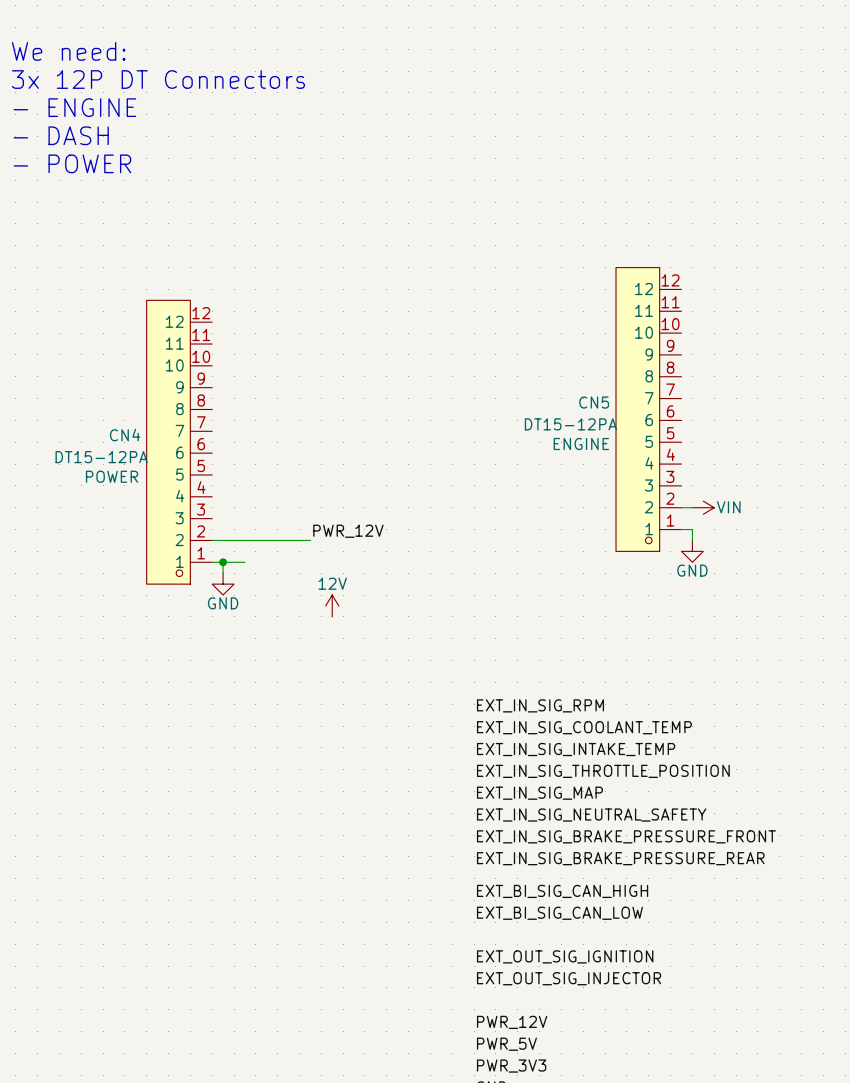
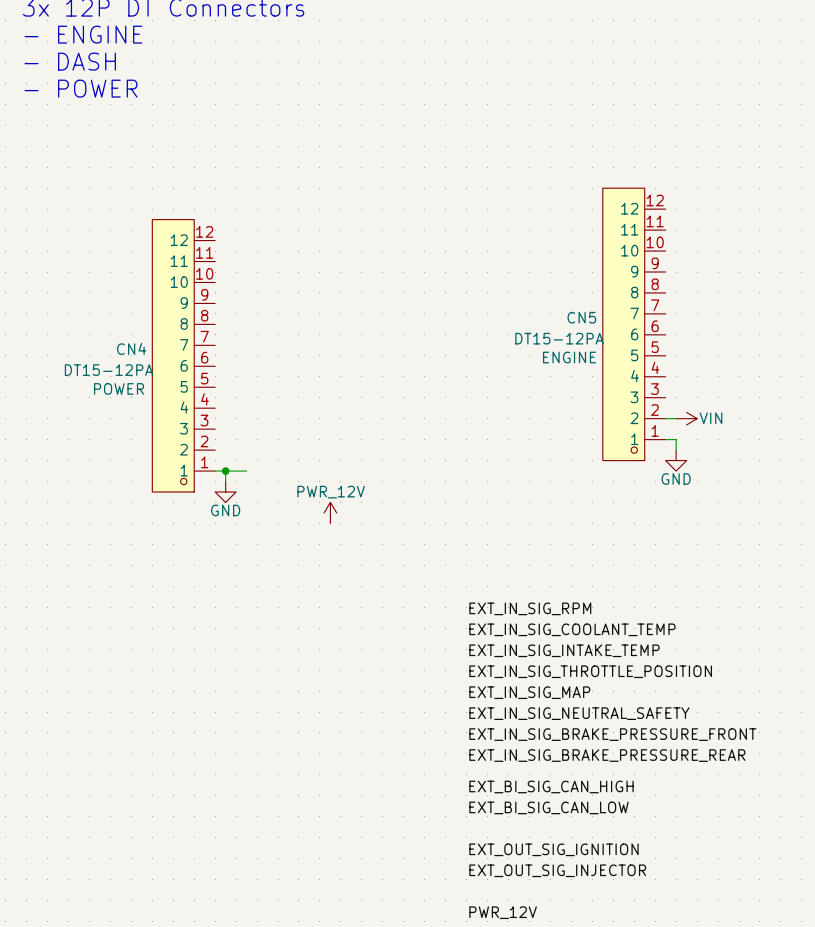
label: PWR_12V (348, 531) -> none
wire: (212, 540) (310, 540) -> none
power symbol: 12V (332, 605) -> PWR_12V (330, 512)

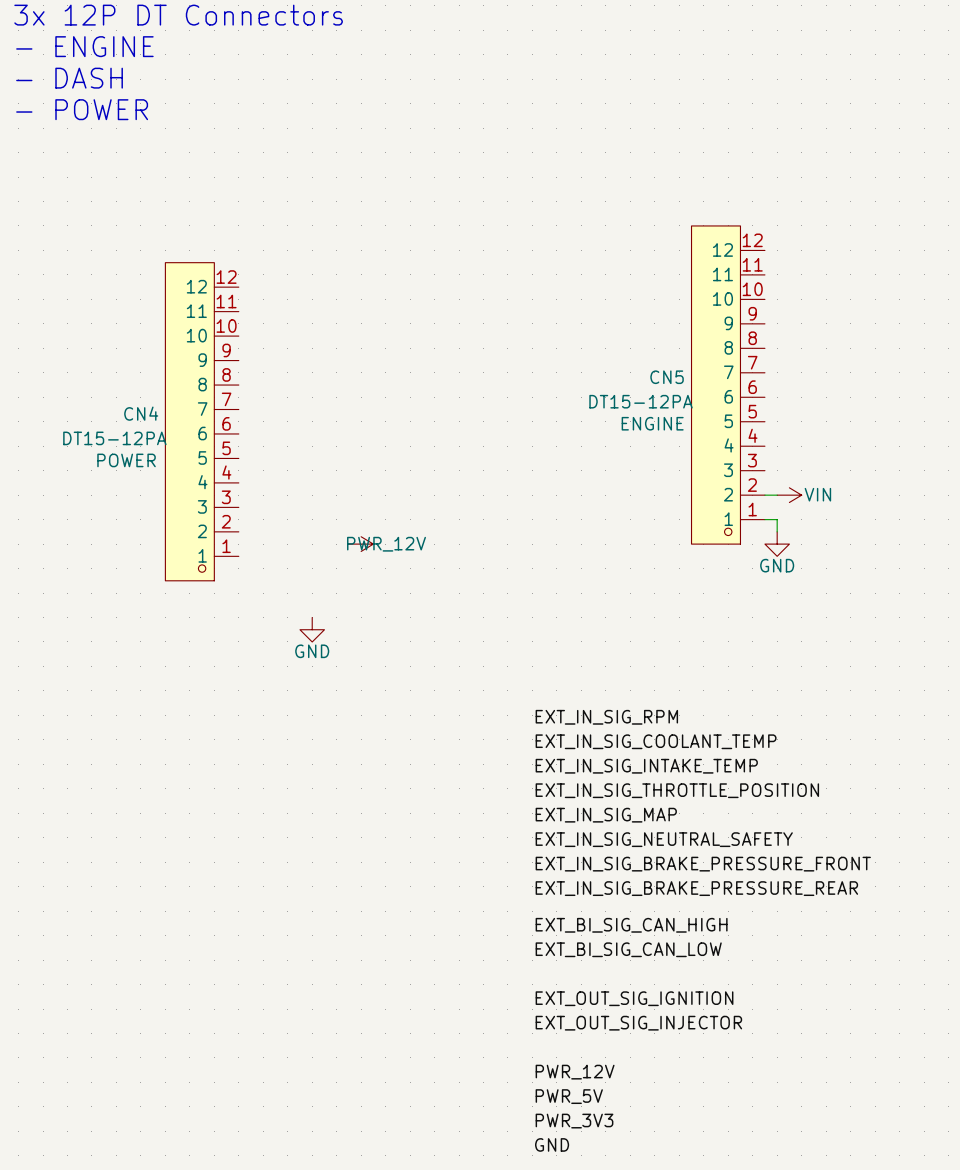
wire: (215, 471) (246, 471) -> none
wire: (225, 471) (225, 481) -> none
junction: (225, 471) -> none
power symbol position: GND (225, 492) -> GND (312, 629)
power symbol rotation: 0° (330, 512) -> 90° clockwise (361, 544)
power symbol position: PWR_12V (330, 512) -> PWR_12V (361, 544)

